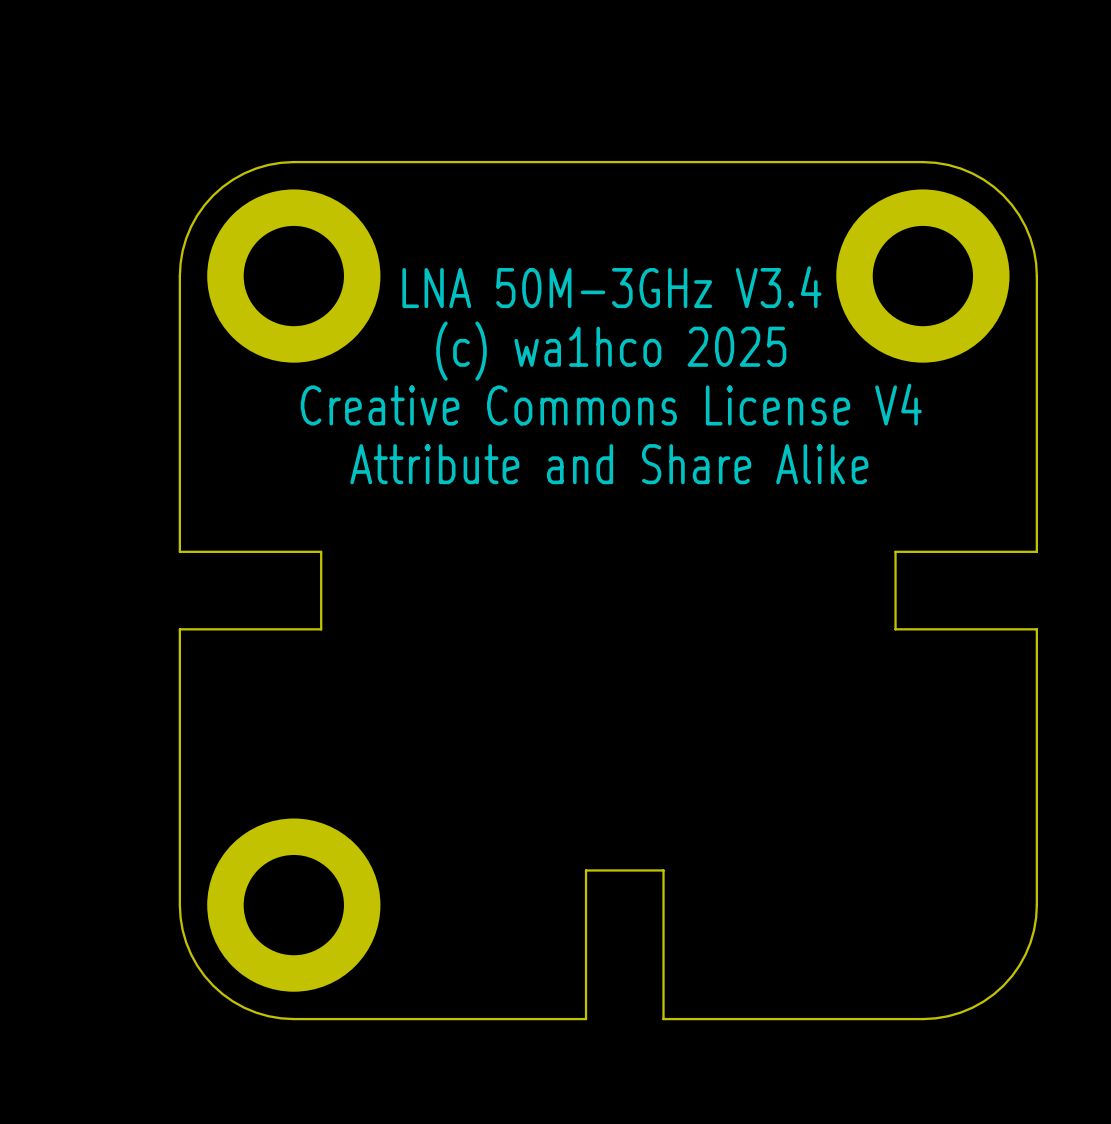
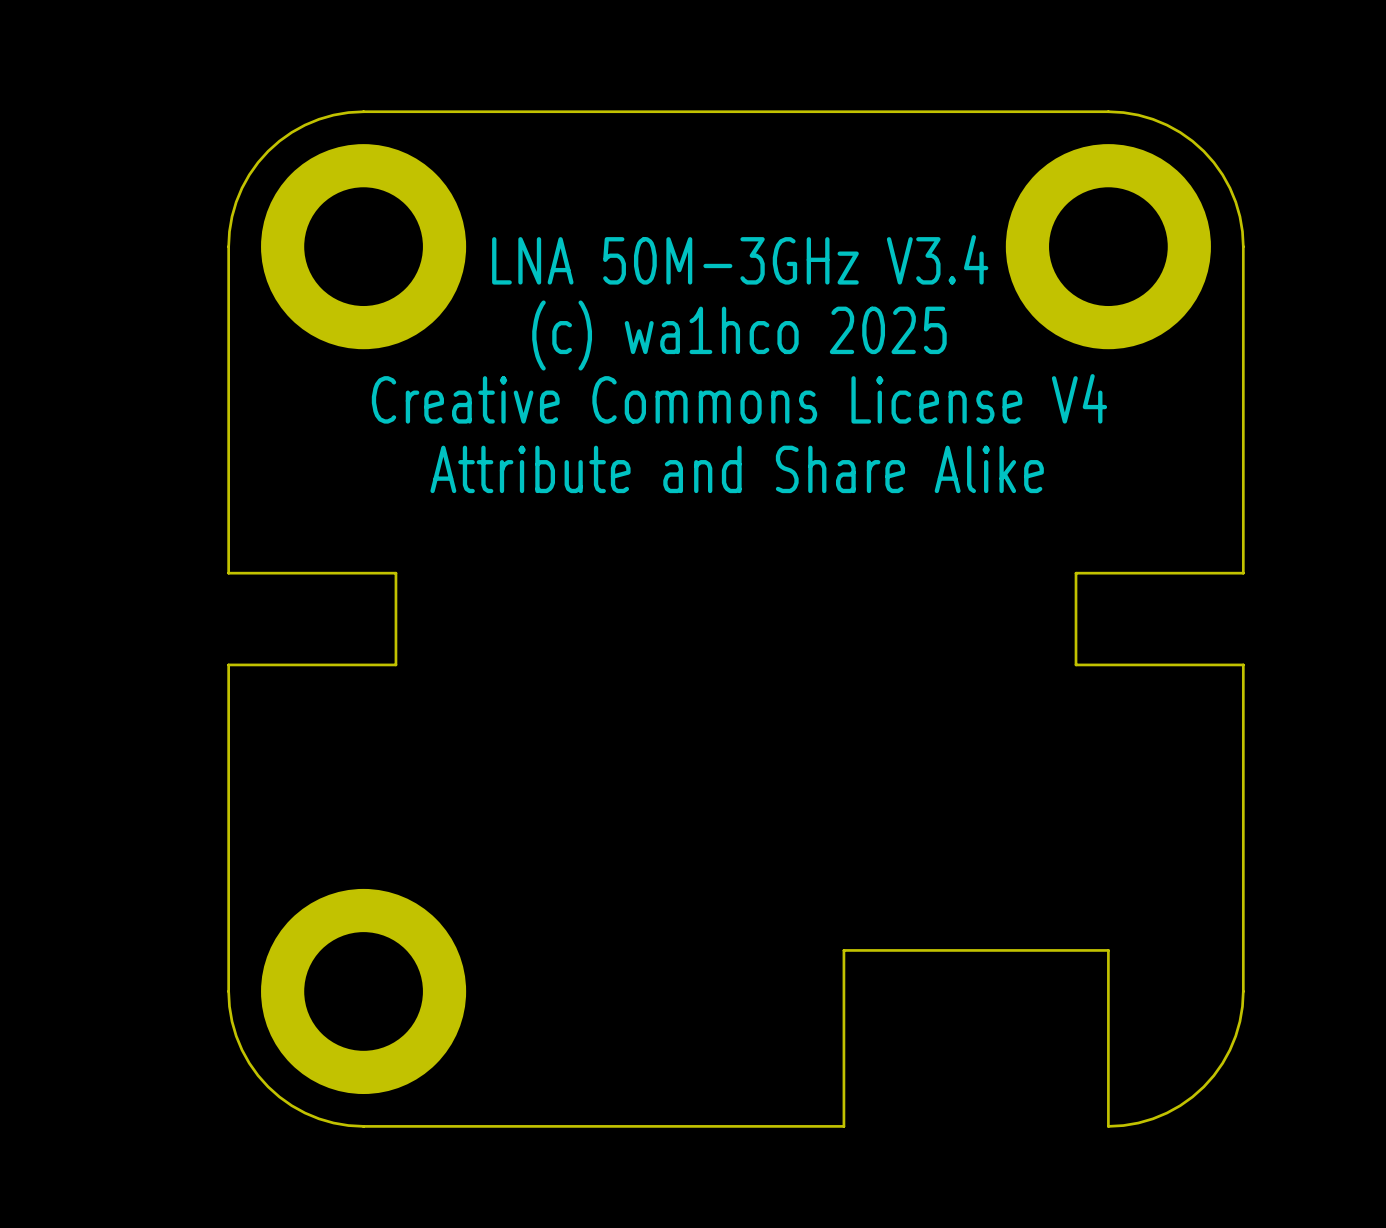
board edge: (663, 1019) (663, 870) (586, 870) (586, 1019) -> (801, 1126) (709, 1126)
board edge: (922, 1019) (699, 1019) -> (1108, 1126) (1108, 950) (843, 950) (843, 1126)

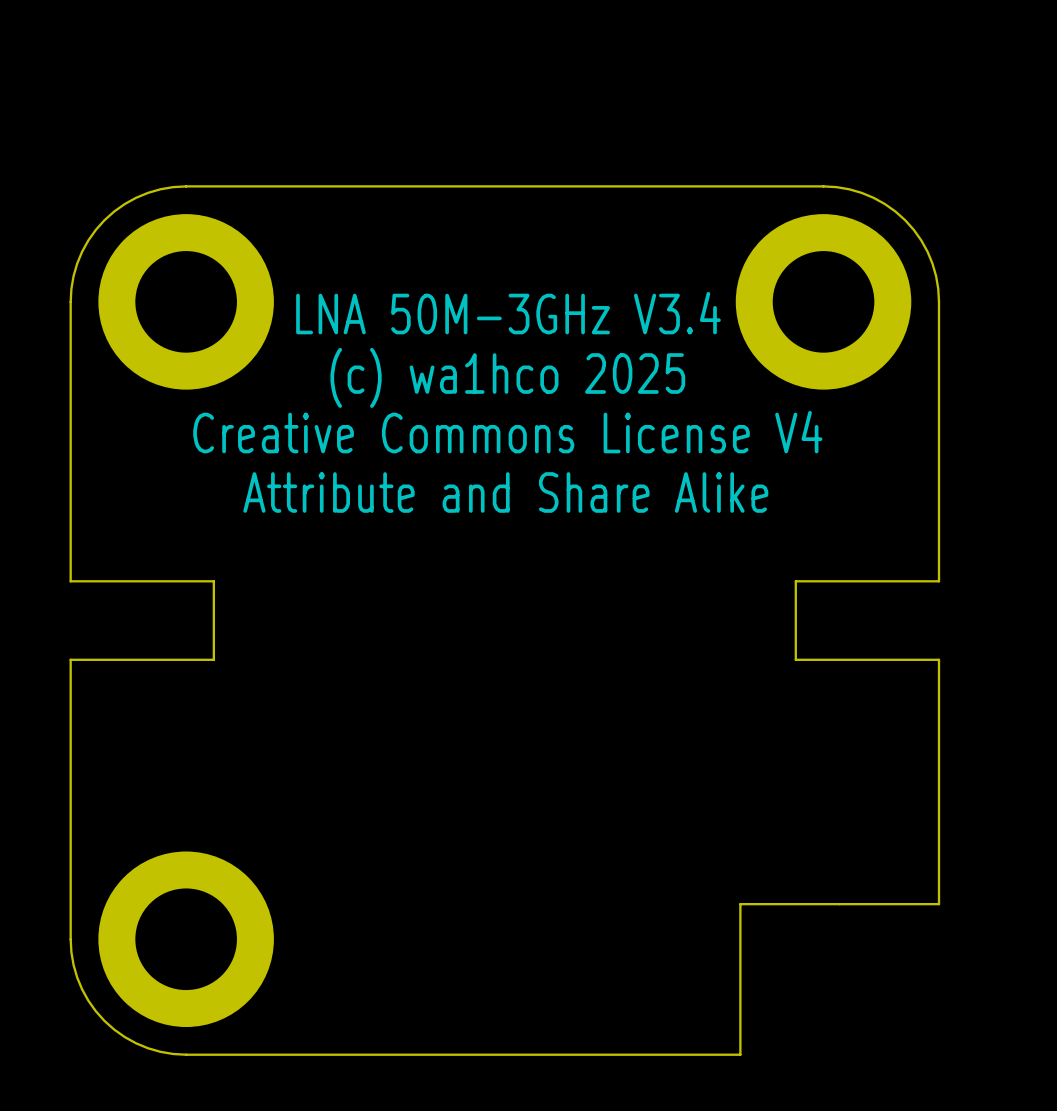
board edge: (1011, 950) (843, 950) (843, 1126) -> (740, 904) (740, 1054) (597, 1054)
board edge: (1243, 950) (1243, 991) (1239, 1021) (1229, 1050) (1213, 1075) (1192, 1096) (1166, 1113) (1138, 1123) (1108, 1126) (1108, 950) -> (939, 904) (823, 904)

